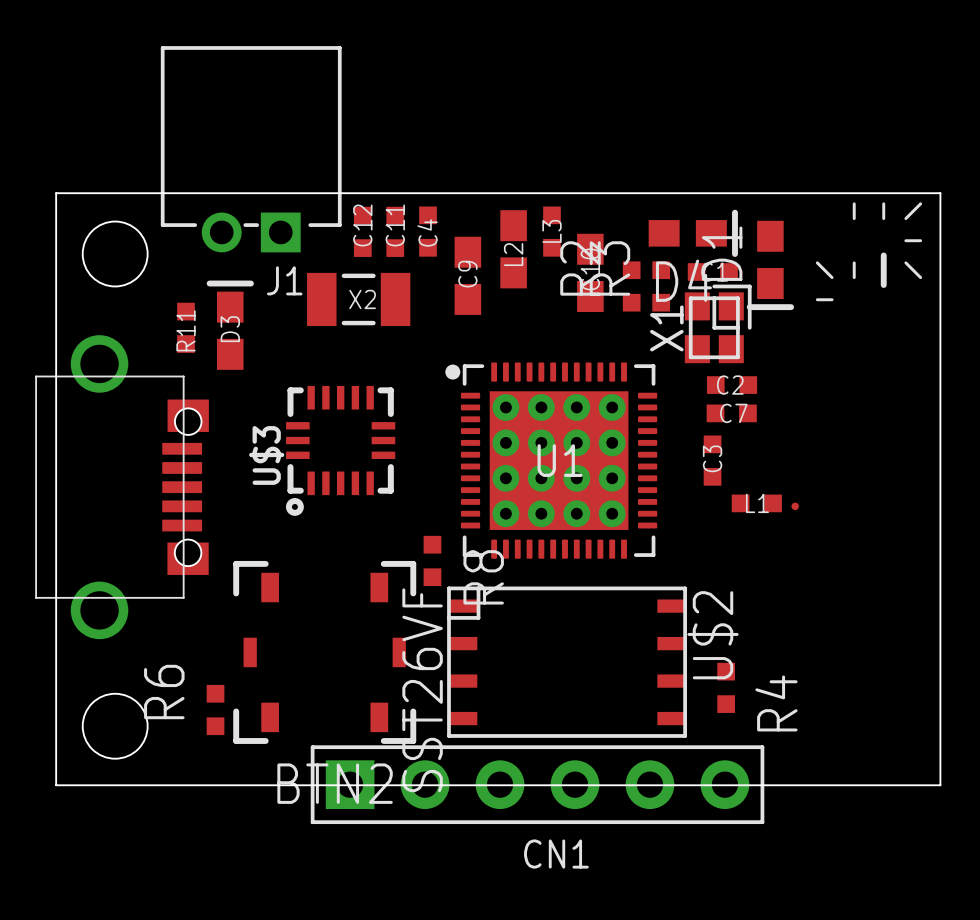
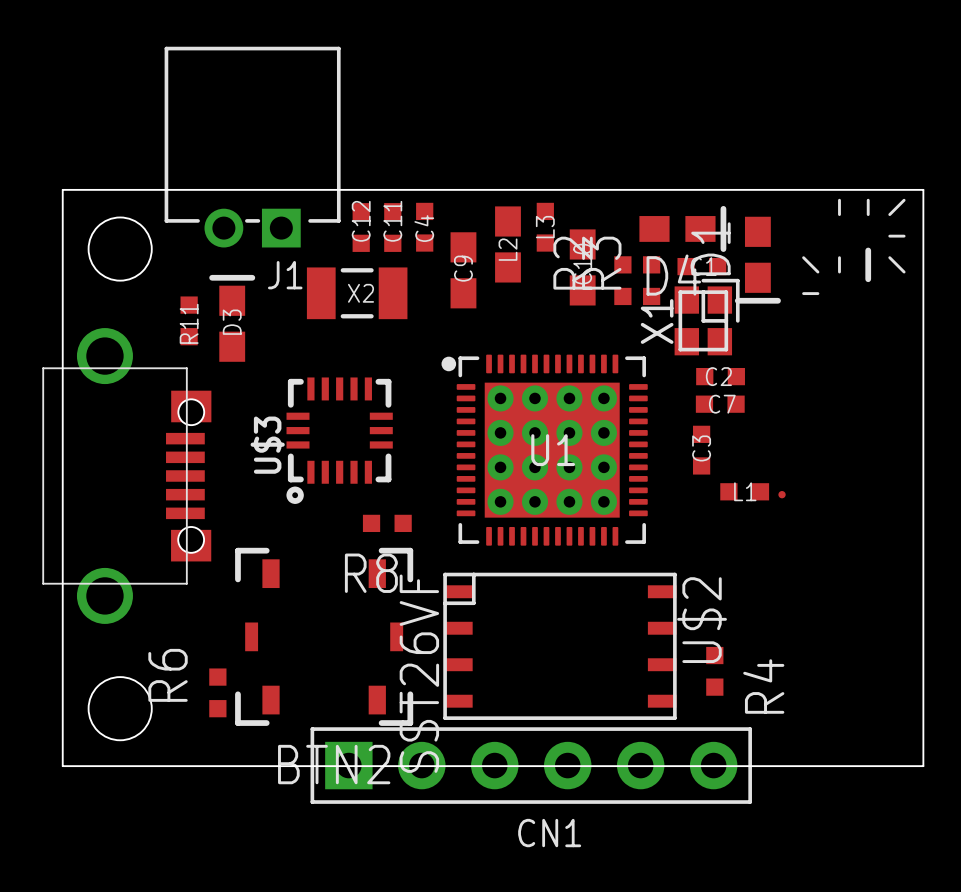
R8 rotation: 0° (432, 560) -> 90° clockwise (387, 523)
R8 position: (432, 560) -> (387, 523)

